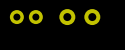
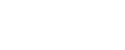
part: (26, 17) -> none
part: (79, 17) -> none

